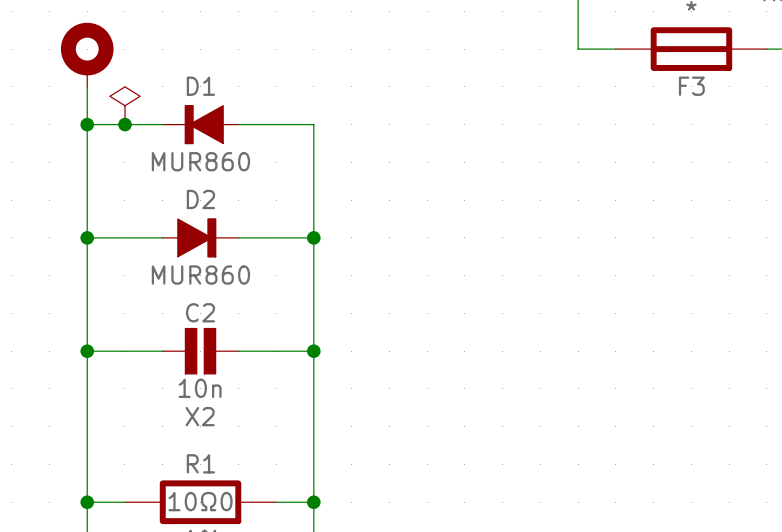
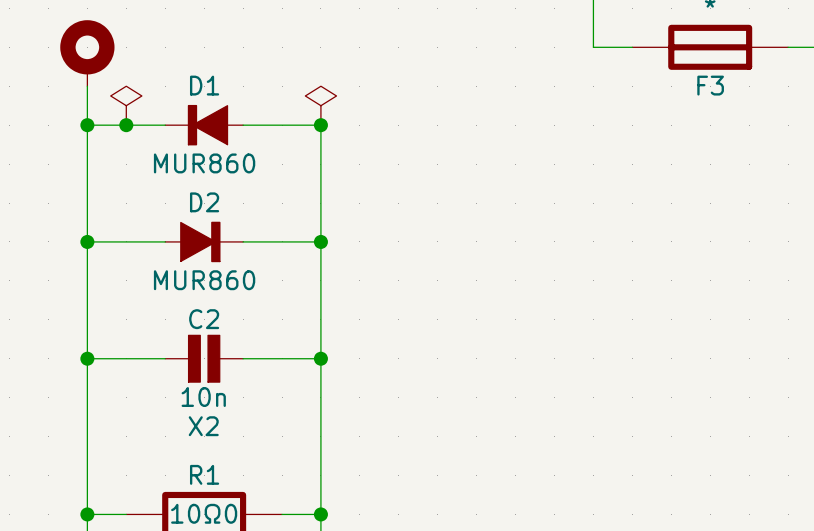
power symbol: none -> (320, 105)
junction: none -> (320, 125)

